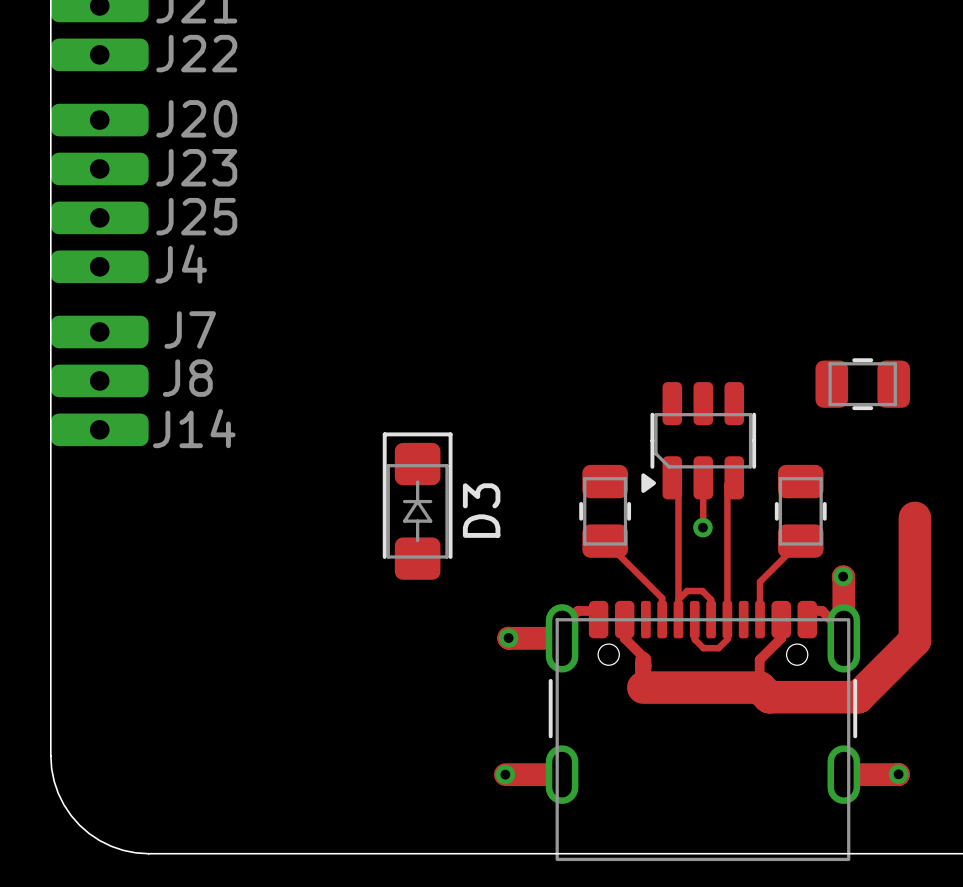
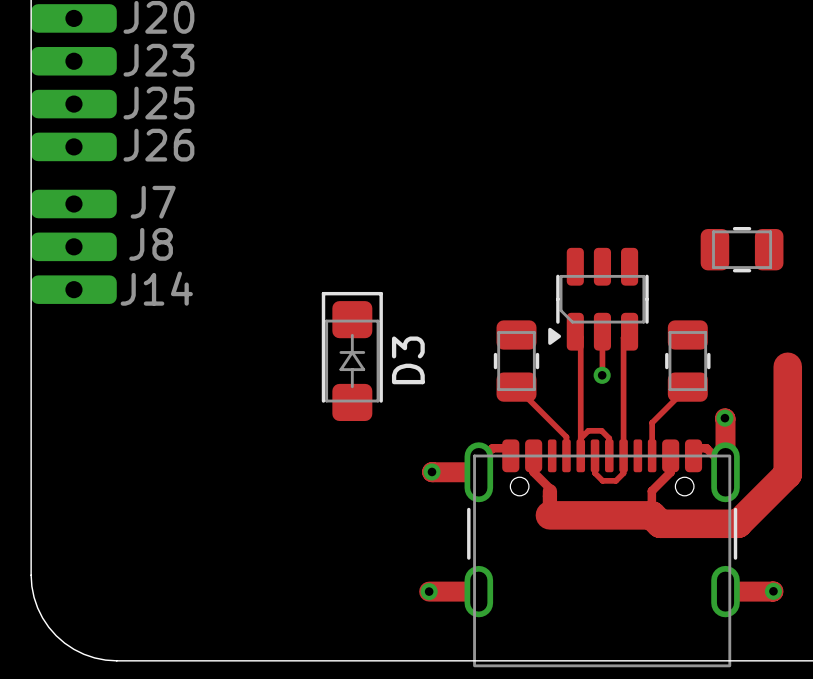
J4 name: J4 (181, 263) -> J26 (158, 145)

